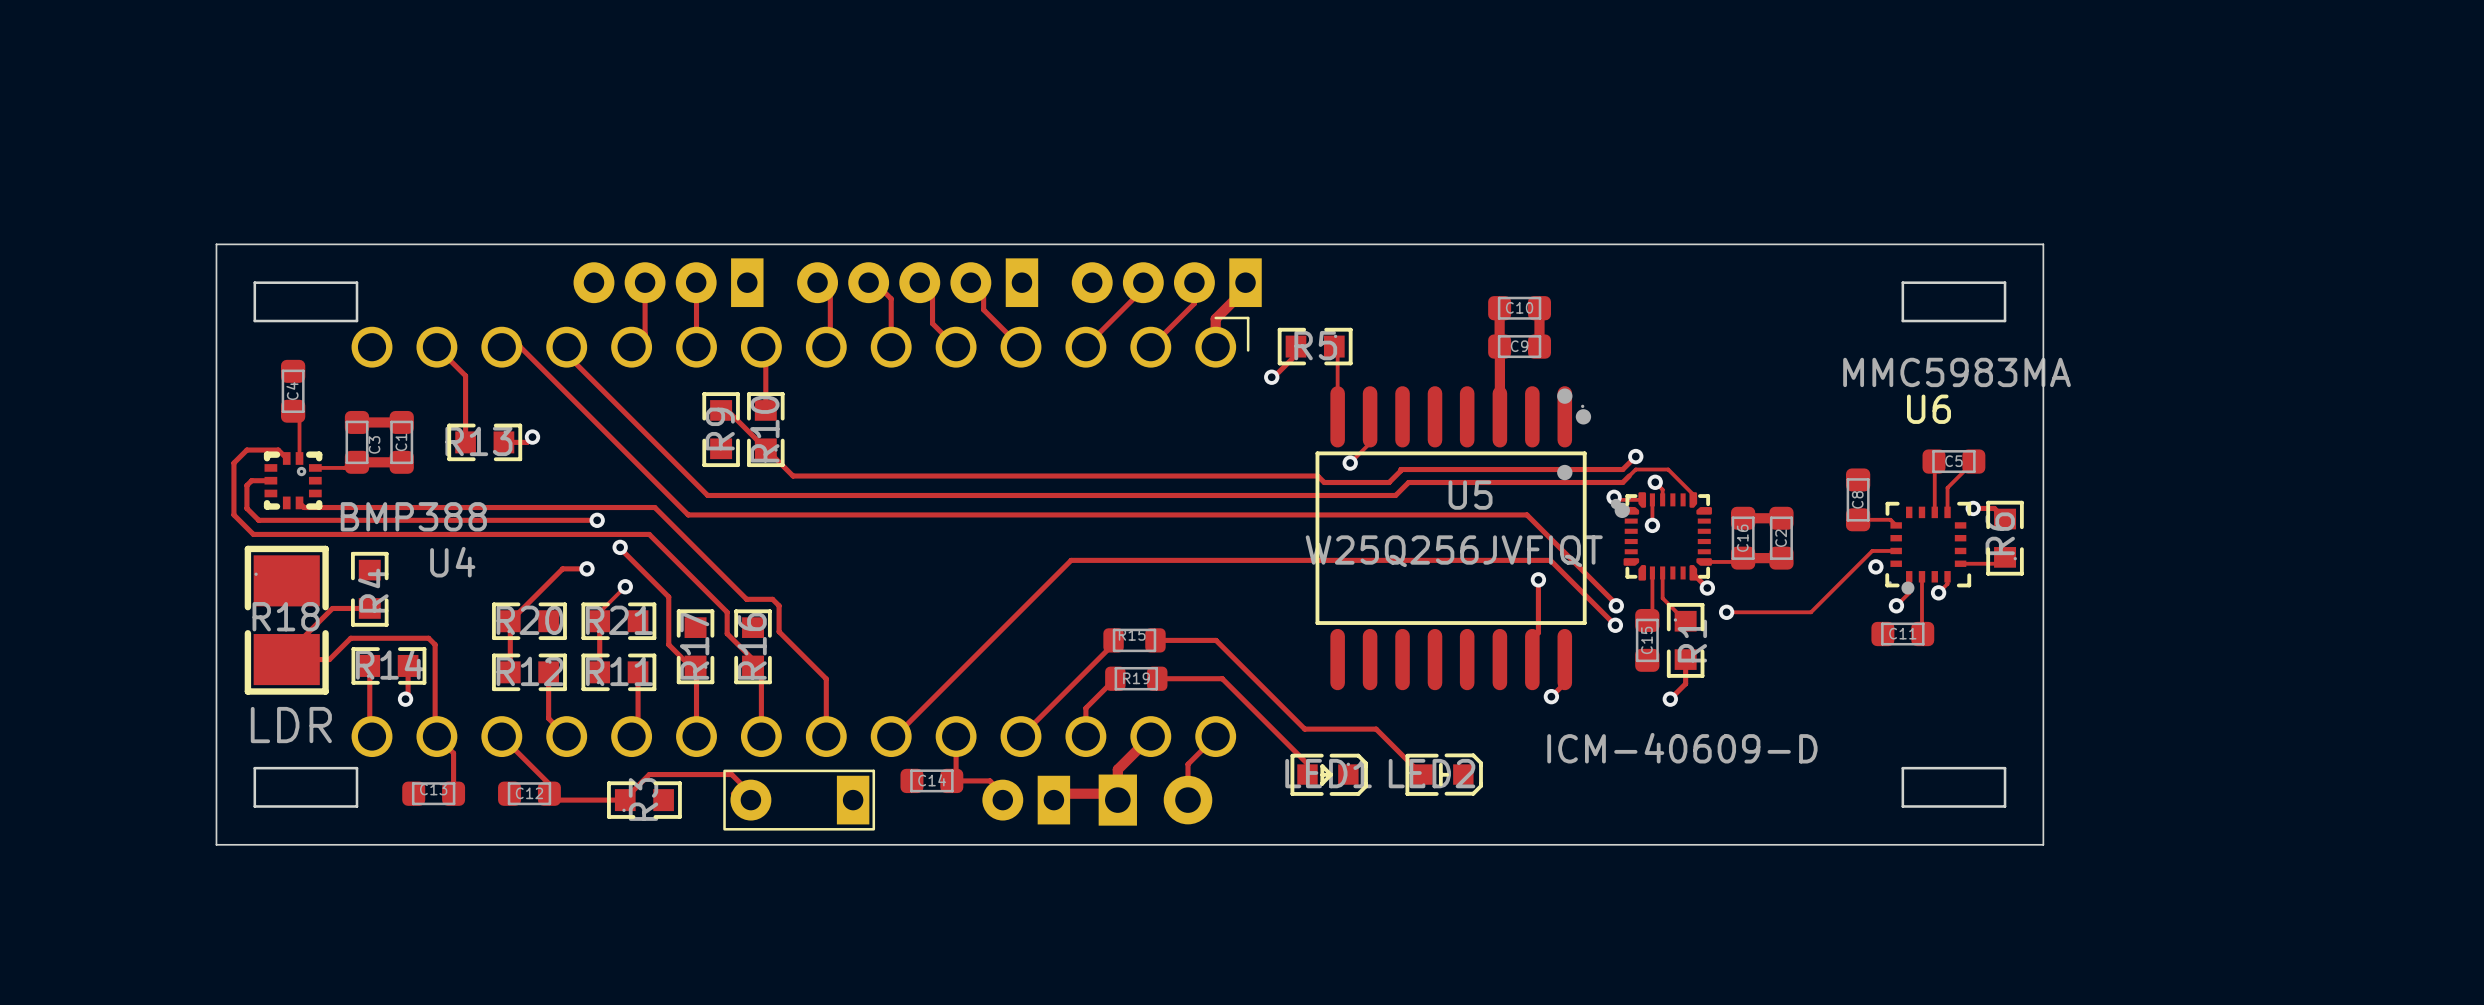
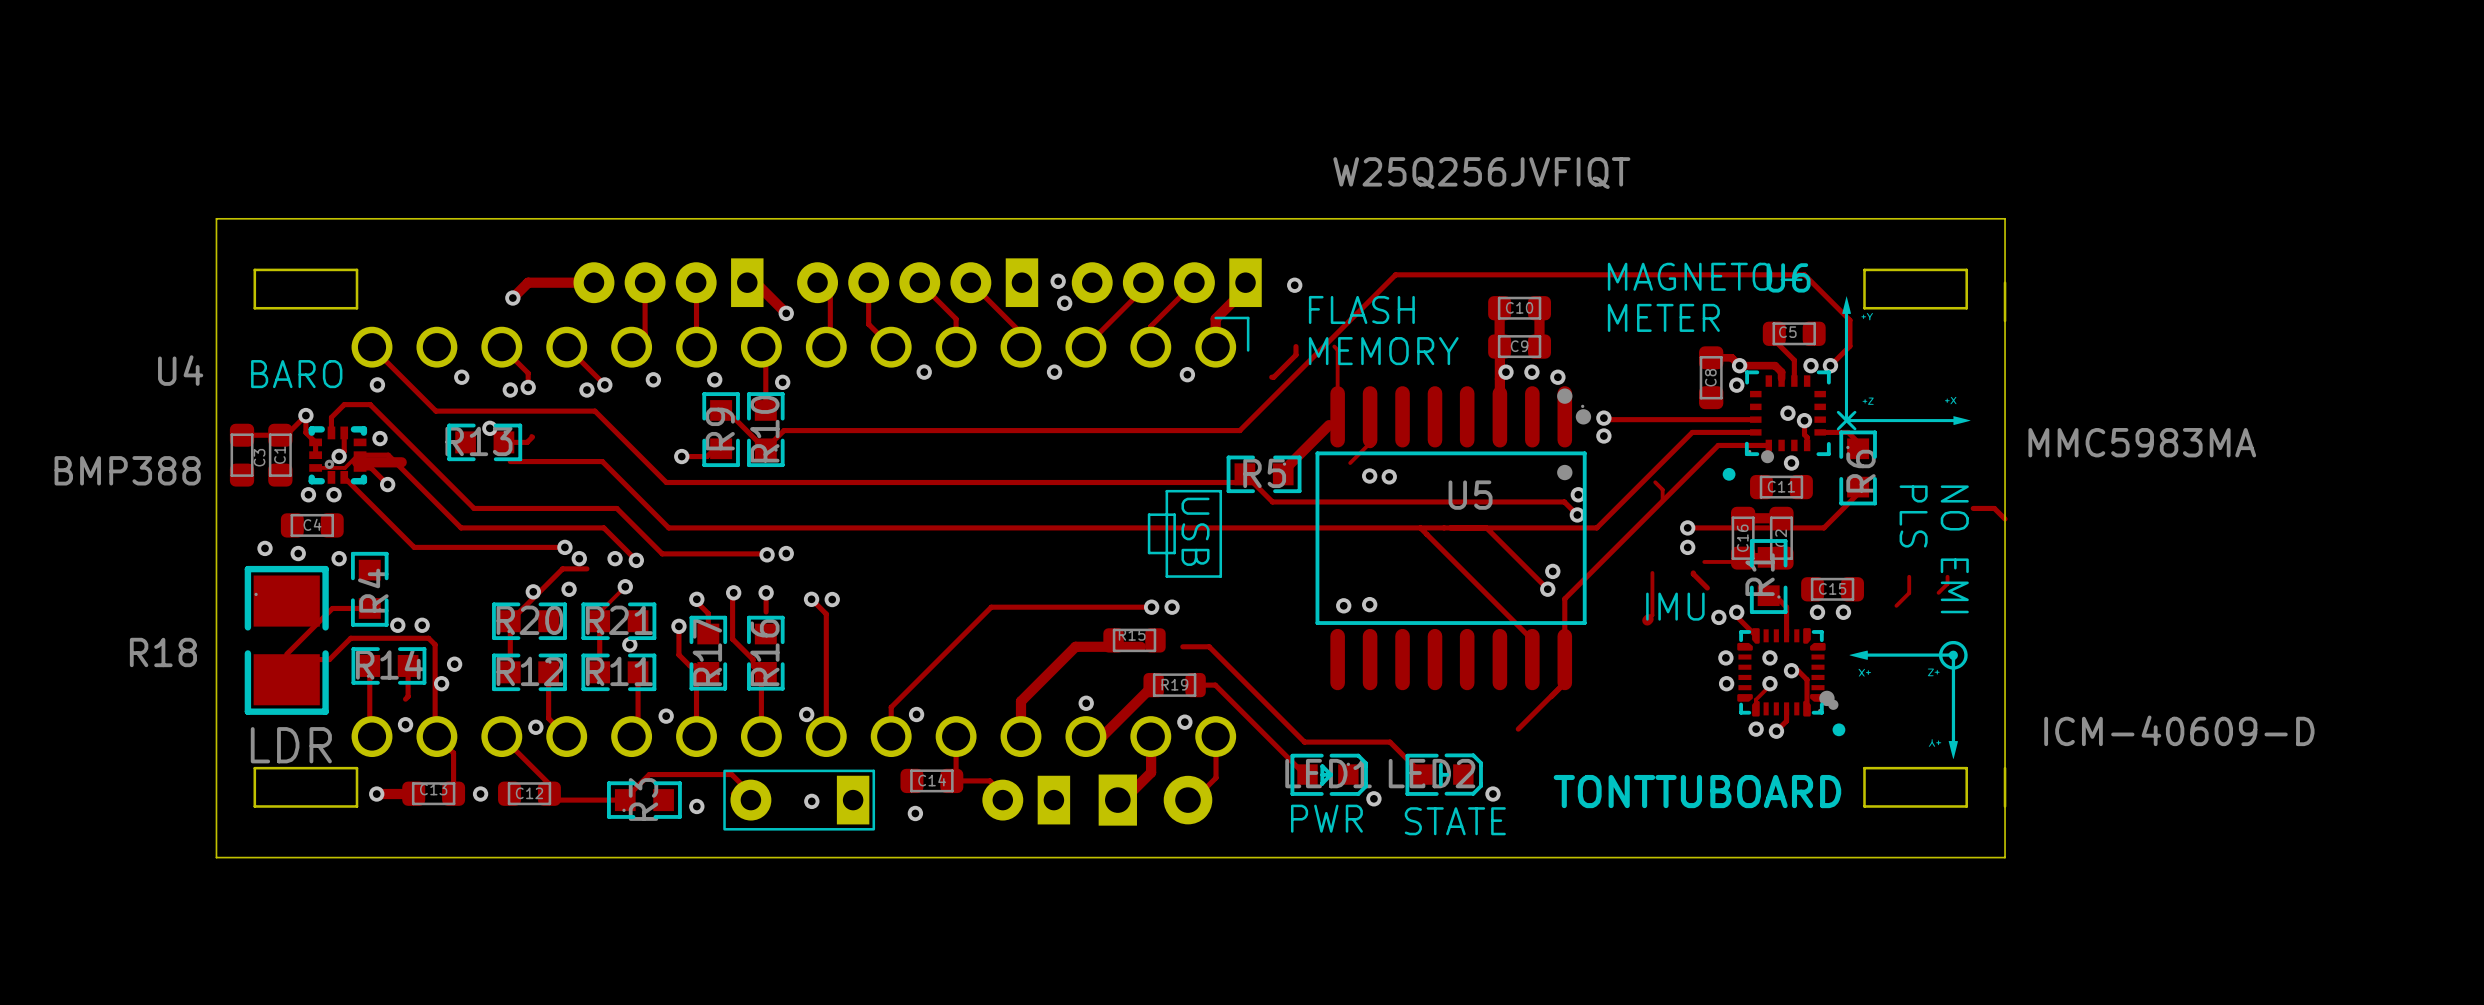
board edge: (216, 244) (2043, 244) (2043, 844) (216, 844) -> (216, 244) (216, 218) (2005, 218) (2005, 282)
board edge: none -> (1864, 269) (1966, 269) (1966, 308) (1864, 308) (1864, 269)
text: none -> MAGNETO- (1705, 276)
via: none -> (1058, 281)
board edge: (254, 282) (357, 282) -> (254, 282) (254, 269) (357, 269) (357, 282)
track: none -> (593, 282) (528, 282) (512, 298)
track: none -> (747, 282) (755, 282) (786, 313)
board edge: (2005, 282) (1902, 282) (1902, 321) (2005, 321) -> (2005, 768) (2005, 321)
via: none -> (1294, 285)
track: (881, 289) (891, 298) (891, 347) -> (868, 282) (868, 324) (891, 346)
track: (932, 289) (932, 323) (956, 347) -> (919, 282) (956, 319) (956, 346)
track: (983, 289) (983, 309) (1021, 347) -> (970, 282) (1021, 332) (1021, 346)
track: (1194, 289) (1194, 303) (1150, 347) -> (1194, 282) (1150, 326) (1150, 346)
drawing: none -> [1836, 296, 1971, 431]
via: none -> (512, 298)
via: none -> (1064, 303)
board edge: (254, 308) (254, 321) (357, 321) (357, 308) -> (254, 308) (357, 308)
text: none -> FLASH (1361, 309)
via: none -> (786, 313)
text: none -> METER (1663, 317)
track: none -> (1774, 340) (1794, 360) (1794, 381)
R5 position: (1315, 346) -> (1264, 474)
track: none -> (372, 347) (435, 411) (594, 411) (666, 482) (1236, 482) (1244, 474) (1272, 501) (1564, 501) (1577, 514)
track: (436, 347) (465, 375) (465, 435) -> none
track: (501, 347) (520, 347) (688, 514) (1526, 514) (1616, 605) -> (501, 346) (528, 373) (528, 387)
track: (566, 347) (566, 360) (573, 360) (707, 495) (1395, 495) (1408, 482) (1622, 482) (1635, 469) (1668, 469) (1693, 494) (1693, 499) -> (566, 346) (604, 384)
text: none -> MEMORY (1383, 351)
track: none -> (1711, 357) (1731, 357) (1739, 365) (1775, 365) (1781, 372) (1781, 381)
via: none -> (1739, 365)
via: none -> (1811, 365)
track: none -> (1830, 365) (1849, 346) (1849, 320) (1804, 274) (1395, 274) (1239, 430) (784, 430) (765, 448) (759, 448)
via: none -> (1830, 365)
via: none -> (924, 372)
via: none -> (1054, 372)
via: none -> (1505, 372)
via: none -> (1531, 372)
U6 value position: MMC5983MA (1957, 372) -> MMC5983MA (2142, 442)
text: none -> BARO (296, 374)
via: none -> (1187, 374)
via: none -> (461, 377)
via: (1271, 377) -> none
via: none -> (1557, 377)
via: none -> (653, 379)
via: none -> (714, 379)
via: none -> (782, 382)
via: none -> (377, 384)
via: none -> (604, 384)
via: none -> (1736, 385)
via: none -> (528, 387)
via: none -> (510, 390)
via: none -> (586, 390)
C4 rotation: 0° (293, 391) -> 90° clockwise (312, 525)
C4 position: (293, 391) -> (312, 525)
track: (726, 410) (793, 476) (1317, 476) (1324, 482) (1389, 482) (1400, 469) (1622, 469) (1635, 456) -> (726, 410) (764, 448)
track: (293, 411) (299, 417) (299, 458) -> none
via: none -> (1787, 413)
via: none -> (305, 415)
track: none -> (1603, 418) (1605, 419) (1755, 419)
via: none -> (1603, 418)
track: none -> (1804, 420) (1807, 445)
via: none -> (1804, 420)
track: (357, 422) (401, 422) -> none
track: none -> (1329, 425) (1283, 471) (1283, 474)
via: none -> (489, 428)
track: none -> (331, 432) (331, 417) (344, 404) (370, 404) (474, 508) (616, 508) (662, 553) (767, 554)
track: none -> (344, 432) (344, 451) (339, 456)
track: none -> (1755, 432) (1692, 432) (1596, 527) (668, 527) (602, 461) (510, 461)
track: none -> (1820, 432) (1848, 432) (1858, 442)
track: none -> (242, 435) (286, 435) (305, 415) (305, 432) (315, 442) (315, 455)
via: none -> (1603, 435)
via: (532, 437) -> none
via: none -> (379, 438)
C3 position: (357, 442) -> (242, 455)
C1 position: (401, 442) -> (280, 455)
track: none -> (1768, 445) (1718, 445) (1564, 598) (1564, 659)
track: none -> (714, 448) (706, 456) (681, 456)
track: none -> (360, 455) (388, 455) (461, 527) (603, 527) (636, 560)
via: none -> (339, 456)
via: none -> (681, 456)
via: (1635, 456) -> none
track: (286, 458) (278, 450) (246, 450) (233, 463) (233, 514) (253, 534) (649, 534) (727, 612) (727, 633) (732, 639) -> (733, 592) (732, 639)
track: (1934, 461) (1934, 512) -> none
C5 position: (1953, 461) -> (1794, 333)
C5 name position: C5 (1953, 461) -> C5 (1787, 332)
track: (1973, 461) (1947, 487) (1947, 512) -> none
via: (1350, 463) -> none
via: none -> (1791, 463)
track: none -> (360, 467) (371, 467) (387, 484)
drawing: none -> [1722, 467, 1736, 481]
via: none -> (1369, 476)
via: none -> (1389, 476)
track: none -> (344, 477) (414, 547) (564, 547)
track: (270, 480) (251, 480) (246, 485) (246, 508) (258, 520) (597, 520) -> none
U4 rotation: 0° (293, 480) -> 180° (337, 455)
U4 position: (293, 480) -> (337, 455)
track: none -> (1858, 480) (1858, 493) (1823, 527) (1687, 527)
via: (1655, 482) -> none
via: none -> (387, 484)
line: none -> (1166, 491) (1220, 491) (1220, 576) (1166, 576) (1166, 491)
via: none -> (308, 494)
via: none -> (334, 494)
via: none -> (1578, 494)
track: (1614, 497) (1616, 499) (1642, 499) -> none
via: (1614, 497) -> none
track: (1652, 499) (1652, 525) -> none
C8 position: (1858, 499) -> (1711, 377)
track: (299, 502) (304, 507) (654, 507) (746, 599) (772, 599) (779, 605) (779, 631) (826, 678) -> (811, 599) (826, 614) (826, 678)
via: (1973, 508) -> none
line: none -> (1149, 514) (1174, 514) (1174, 553) (1149, 553) (1149, 514)
via: none -> (1577, 514)
U4 value position: BMP388 (413, 516) -> BMP388 (127, 470)
text: none -> PLS (1913, 516)
track: (1858, 519) (1890, 519) (1896, 525) -> none
via: (597, 520) -> none
via: (1652, 525) -> none
track: none -> (1486, 527) (1547, 589)
via: none -> (1687, 527)
text: none -> USB (1195, 531)
part rotation: 0° (1661, 536) -> 180° (1787, 672)
part position: (1661, 536) -> (1787, 672)
R6 rotation: 0° (2005, 538) -> 180° (1858, 467)
R6 position: (2005, 538) -> (1858, 467)
via: none -> (564, 547)
track: (620, 547) (668, 597) (668, 644) (678, 654) -> (678, 626) (678, 654)
via position: (620, 547) -> (615, 558)
via: none -> (1687, 547)
via: none -> (265, 548)
U6 position: (1928, 548) -> (1787, 416)
text: none -> NO EMI (1954, 549)
track: (1896, 550) (1872, 550) (1811, 612) (1726, 612) -> none
U5 value position: W25Q256JVFIQT (1454, 551) -> W25Q256JVFIQT (1481, 173)
via: none -> (298, 553)
via: none -> (786, 553)
via: none -> (767, 554)
track: (2005, 557) (1998, 563) (1960, 563) -> none
via: none -> (339, 558)
via: none -> (636, 560)
via: (1875, 566) -> none
via position: (586, 568) -> (579, 558)
via: none -> (1552, 571)
track: (1662, 572) (1662, 598) (1685, 621) -> none
track: (1921, 576) (1922, 634) -> none
track: (1538, 579) (1538, 632) (1532, 638) -> (1420, 527) (1532, 639)
via: (1538, 579) -> none
via: (1707, 588) -> none
via: none -> (569, 589)
via: none -> (1547, 589)
via: none -> (533, 591)
via: none -> (733, 592)
track: none -> (766, 592) (766, 611)
via: none -> (766, 592)
via: (1938, 592) -> none
track: none -> (1775, 595) (1786, 607) (1786, 635)
track: none -> (696, 599) (696, 602) (708, 613) (708, 634)
via: none -> (696, 599)
via: none -> (811, 599)
via: none -> (832, 599)
via: none -> (1369, 604)
via: none -> (1343, 605)
via: (1616, 605) -> none
via: (1896, 605) -> none
text: none -> IMU (1675, 606)
via: none -> (1151, 607)
via: none -> (1172, 607)
via: (1726, 612) -> none
track: none -> (1736, 612) (1736, 616) (1755, 635)
via: none -> (1736, 612)
via: none -> (1817, 612)
via: none -> (1843, 612)
R18 name position: R18 (286, 616) -> R18 (163, 652)
via: none -> (1718, 617)
R18 position: (286, 620) -> (286, 640)
via: none -> (397, 625)
via: none -> (422, 625)
track: (1615, 625) (1550, 560) (1071, 560) (894, 736) (891, 736) -> (1151, 607) (991, 607) (891, 707) (891, 736)
via: (1615, 625) -> none
via: none -> (678, 626)
C11 position: (1902, 634) -> (1781, 487)
track: (1108, 640) (1108, 648) (1021, 736) (1014, 730) -> none
track: (1150, 640) (1216, 640) (1304, 729) (1376, 729) (1422, 774) -> (1182, 646) (1209, 646) (1304, 742) (1390, 742) (1422, 774)
C15 rotation: 0° (1647, 640) -> 90° clockwise (1832, 589)
C15 position: (1647, 640) -> (1832, 589)
R1 rotation: 0° (1685, 640) -> 180° (1768, 576)
R1 position: (1685, 640) -> (1768, 576)
drawing: none -> [1832, 640, 1968, 760]
via: none -> (629, 644)
R17 position: (695, 646) -> (708, 653)
R16 position: (753, 646) -> (765, 653)
track: none -> (1140, 646) (1075, 646) (1021, 701) (1021, 736)
via: none -> (1725, 657)
via: none -> (1769, 657)
track: (1685, 659) (1685, 683) (1670, 699) -> none
via: none -> (454, 664)
track: none -> (1791, 670) (1798, 670) (1807, 679) (1807, 708)
via: none -> (1791, 670)
track: (1115, 678) (1085, 708) (1085, 736) -> (1153, 685) (1102, 736) (1085, 736)
R19 position: (1136, 678) -> (1174, 685)
track: (1157, 678) (1222, 678) (1307, 763) (1307, 769) -> none
track: none -> (1564, 682) (1518, 729)
via: none -> (441, 683)
via: none -> (1726, 683)
track: none -> (1769, 683) (1755, 699) (1755, 708)
via: none -> (1769, 683)
track: none -> (1195, 685) (1215, 685) (1304, 774) (1307, 774)
via: (1551, 696) -> none
via: (405, 699) -> none
via: (1670, 699) -> none
via: none -> (1086, 703)
track: none -> (1786, 708) (1786, 721) (1776, 731)
via: none -> (806, 714)
via: none -> (916, 714)
via: none -> (666, 716)
via: none -> (1184, 722)
via: none -> (405, 724)
via: none -> (535, 727)
via: none -> (1756, 729)
via: none -> (1776, 731)
track: (1150, 736) (1117, 769) (1117, 793) (1053, 793) -> none
track: (1215, 736) (1188, 764) (1188, 793) -> none
track: none -> (1151, 742) (1151, 772) (1123, 800)
track: none -> (1216, 742) (1216, 777) (1193, 800)
part value position: ICM-40609-D (1682, 748) -> ICM-40609-D (2179, 730)
board edge: (1902, 768) (1902, 806) -> (1902, 768) (1864, 768) (1864, 806) (1902, 806)
board edge: (1966, 768) (2005, 768) -> (1966, 768) (1966, 806)
text: none -> TONTTUBOARD (1697, 791)
track: none -> (376, 794) (407, 794)
via: none -> (376, 794)
via: none -> (480, 794)
via: none -> (1492, 794)
via: none -> (1373, 798)
via: none -> (811, 801)
via: none -> (696, 806)
board edge: (1966, 806) (2005, 806) -> (216, 844) (216, 857) (2005, 857) (2005, 806)
via: none -> (915, 813)
text: none -> PWR (1326, 818)
text: none -> STATE (1455, 821)

